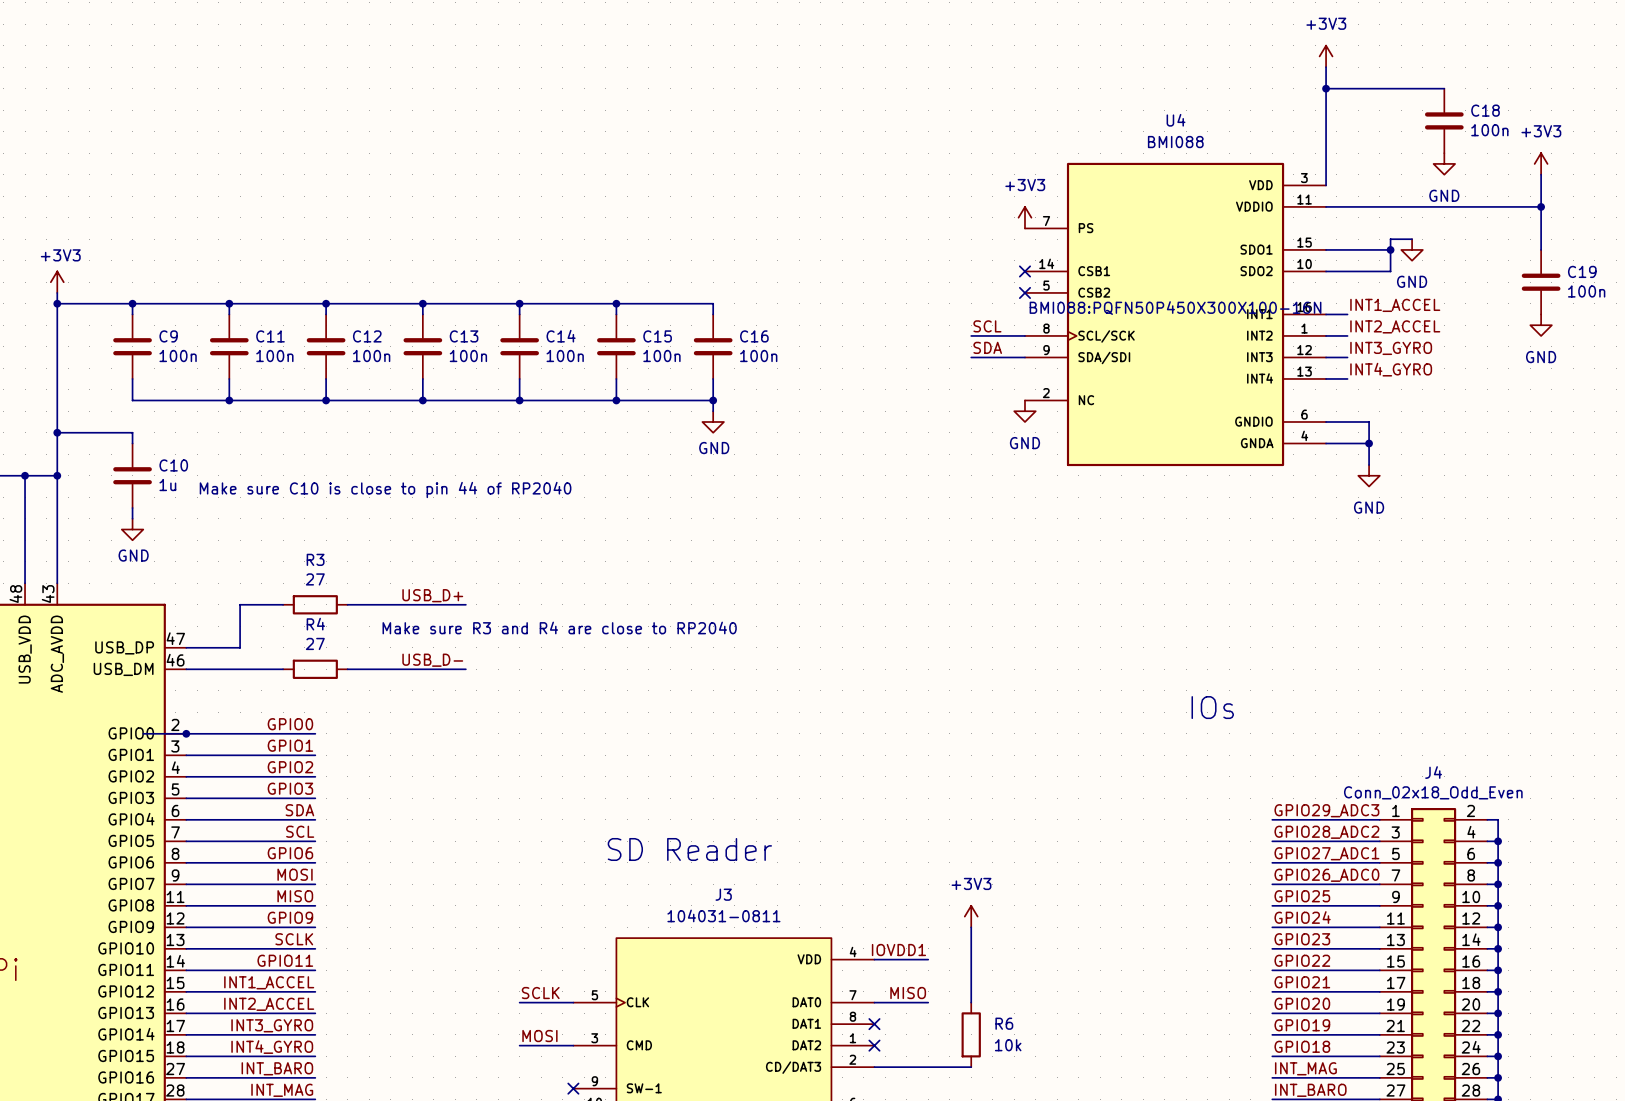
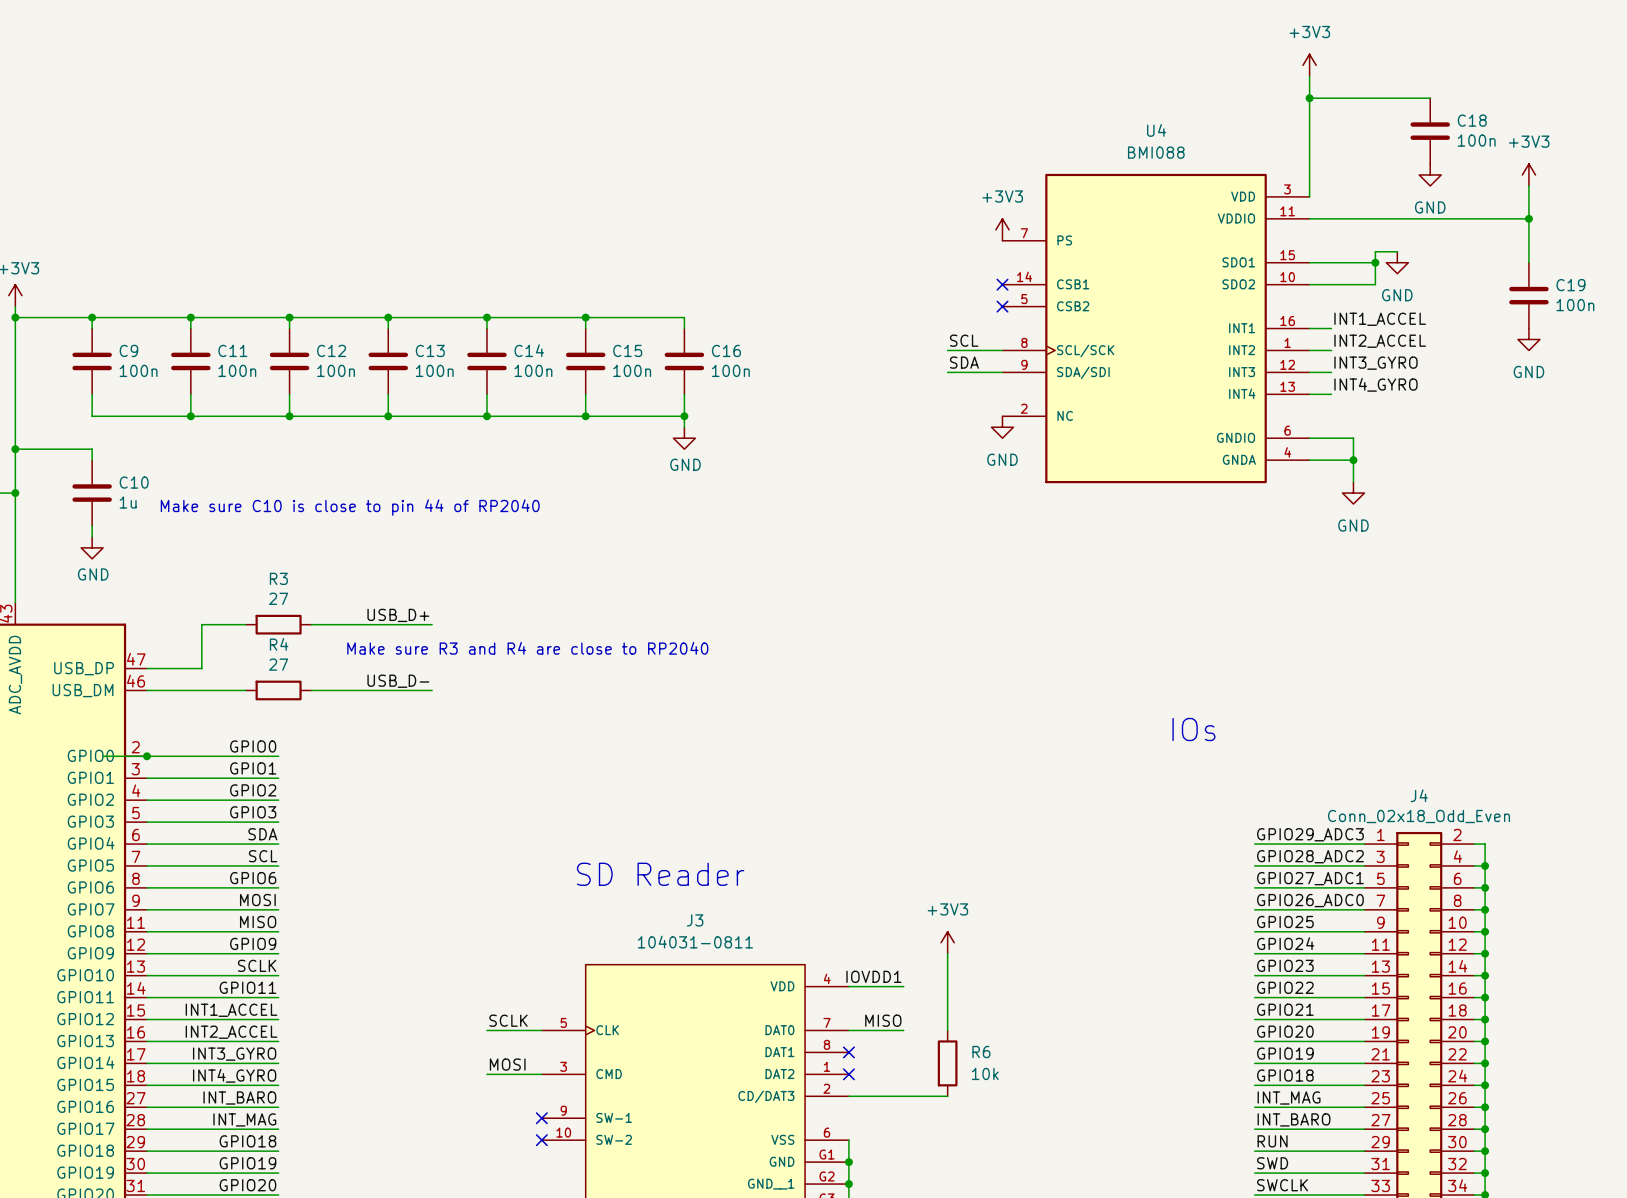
U4 text: BMI088:PQFN50P450X300X100-16N (1175, 308) -> none

